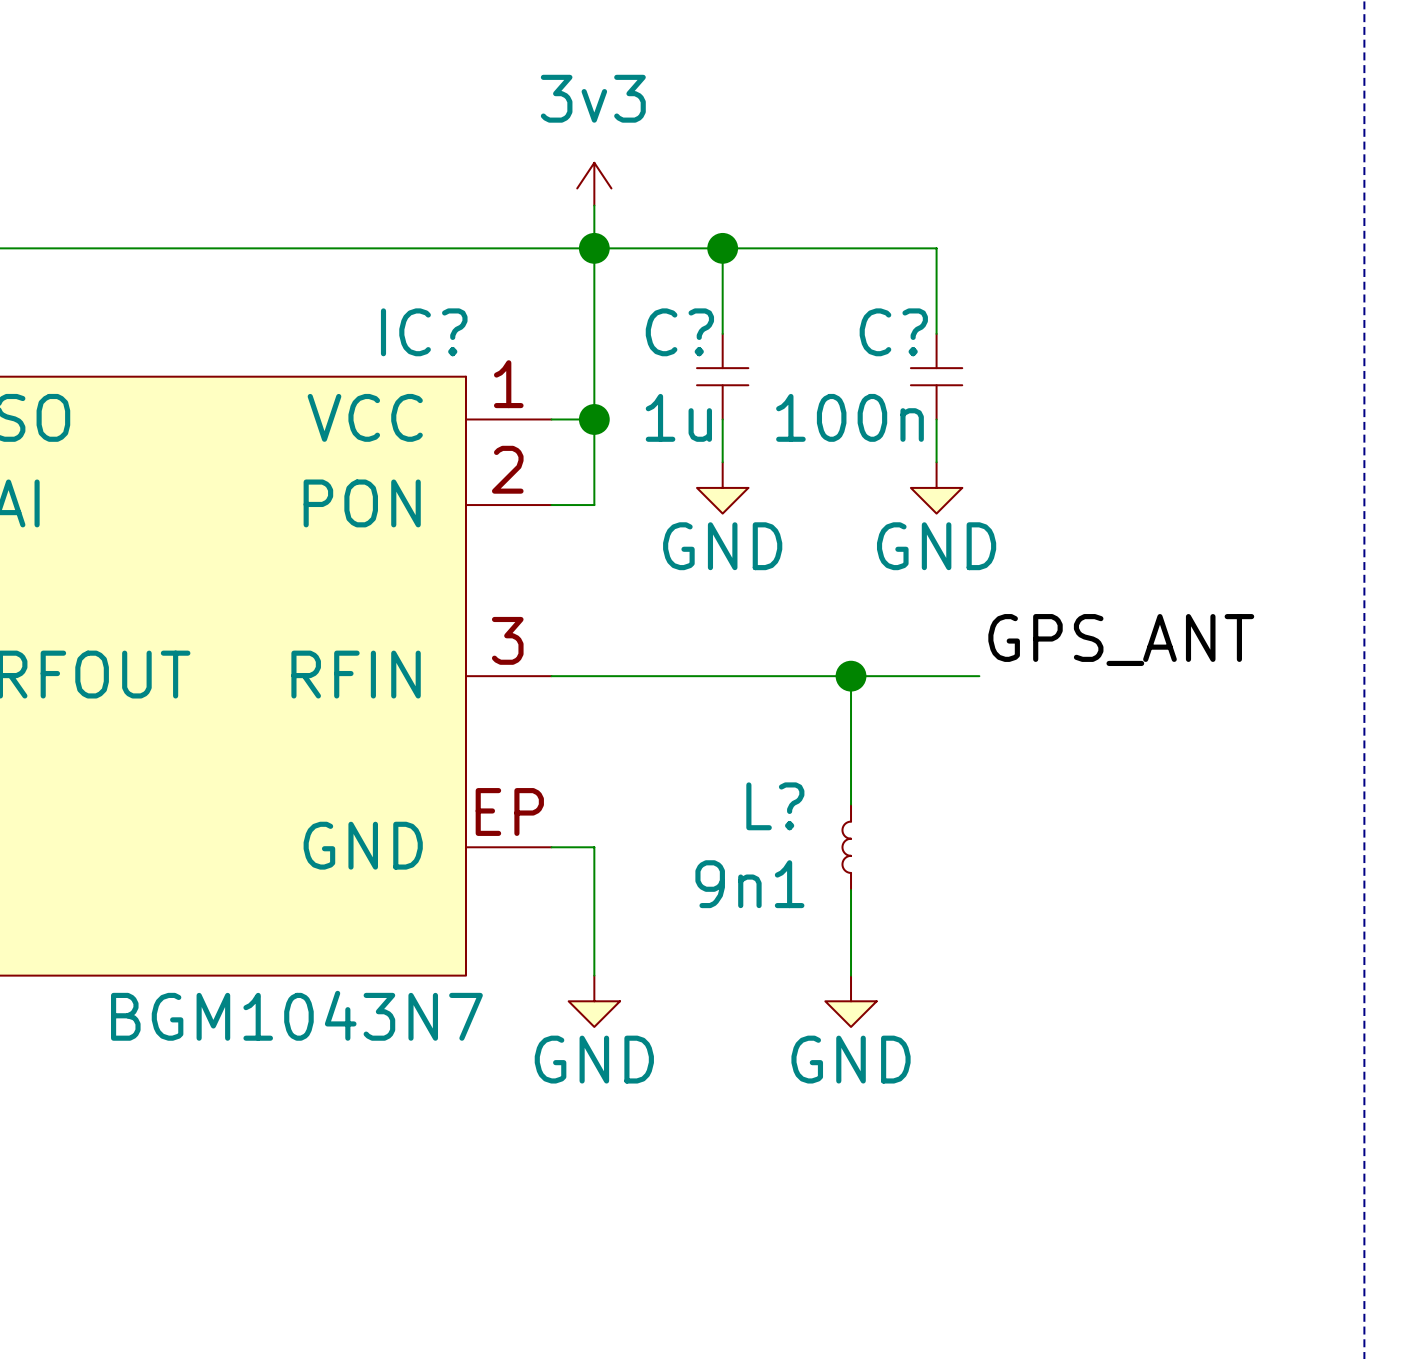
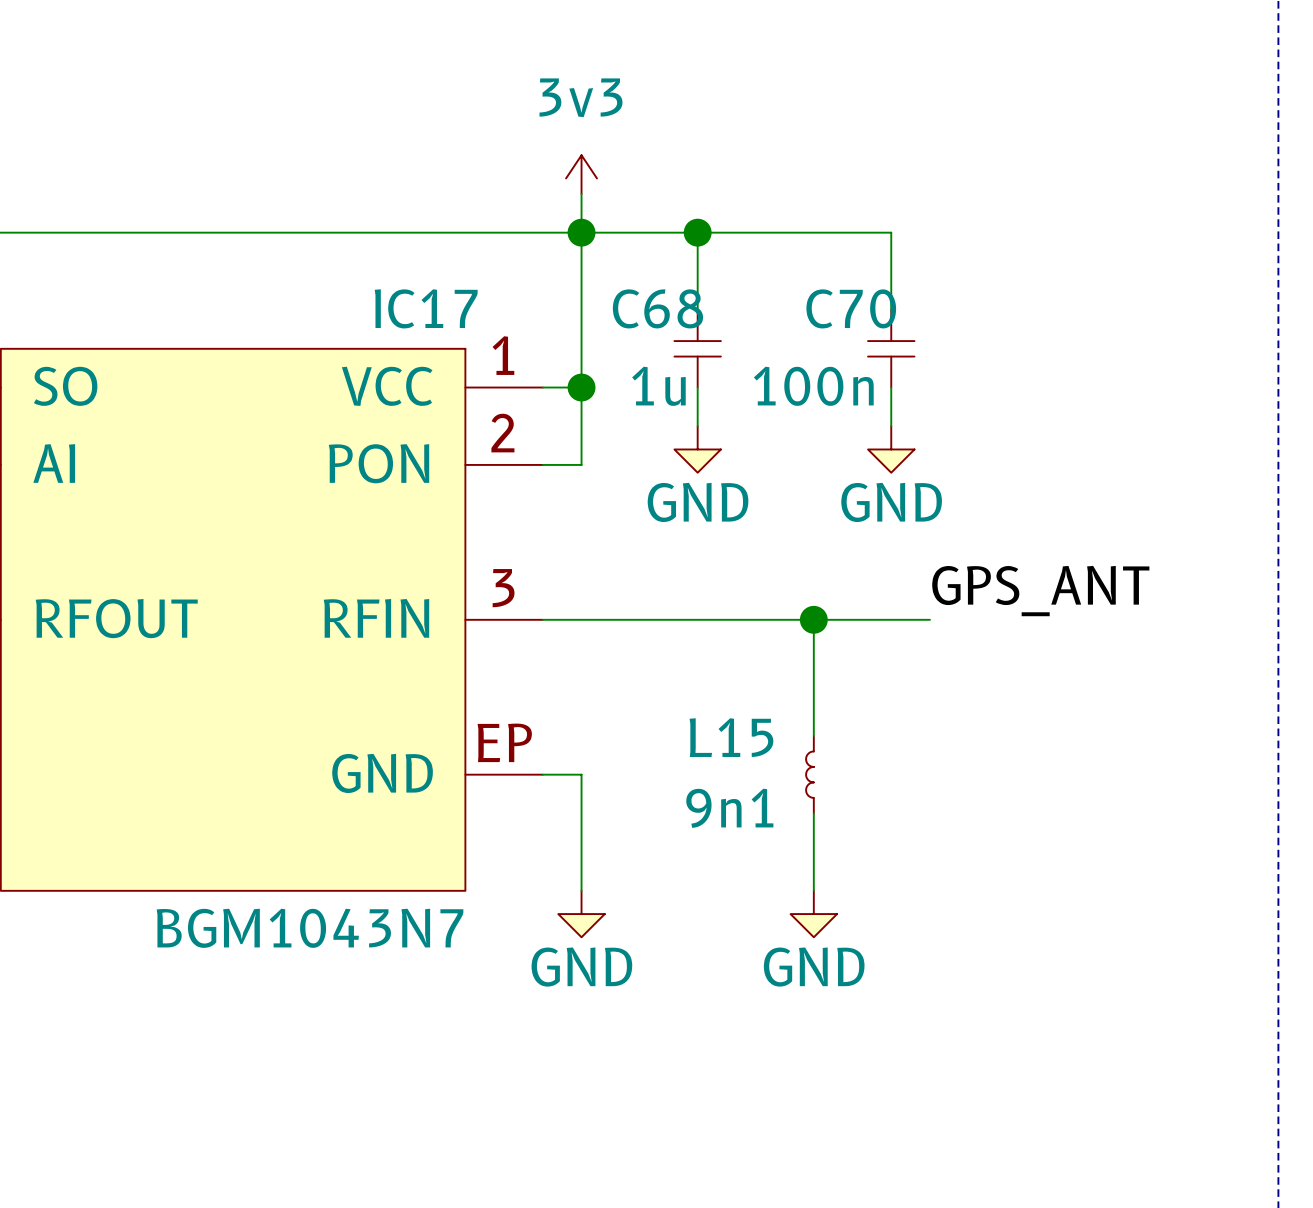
IC? name: IC? (424, 332) -> IC17 (426, 308)
C? name: C? (679, 332) -> C68 (657, 308)
C? name: C? (893, 332) -> C70 (851, 308)
L? name: L? (775, 806) -> L15 (731, 737)

